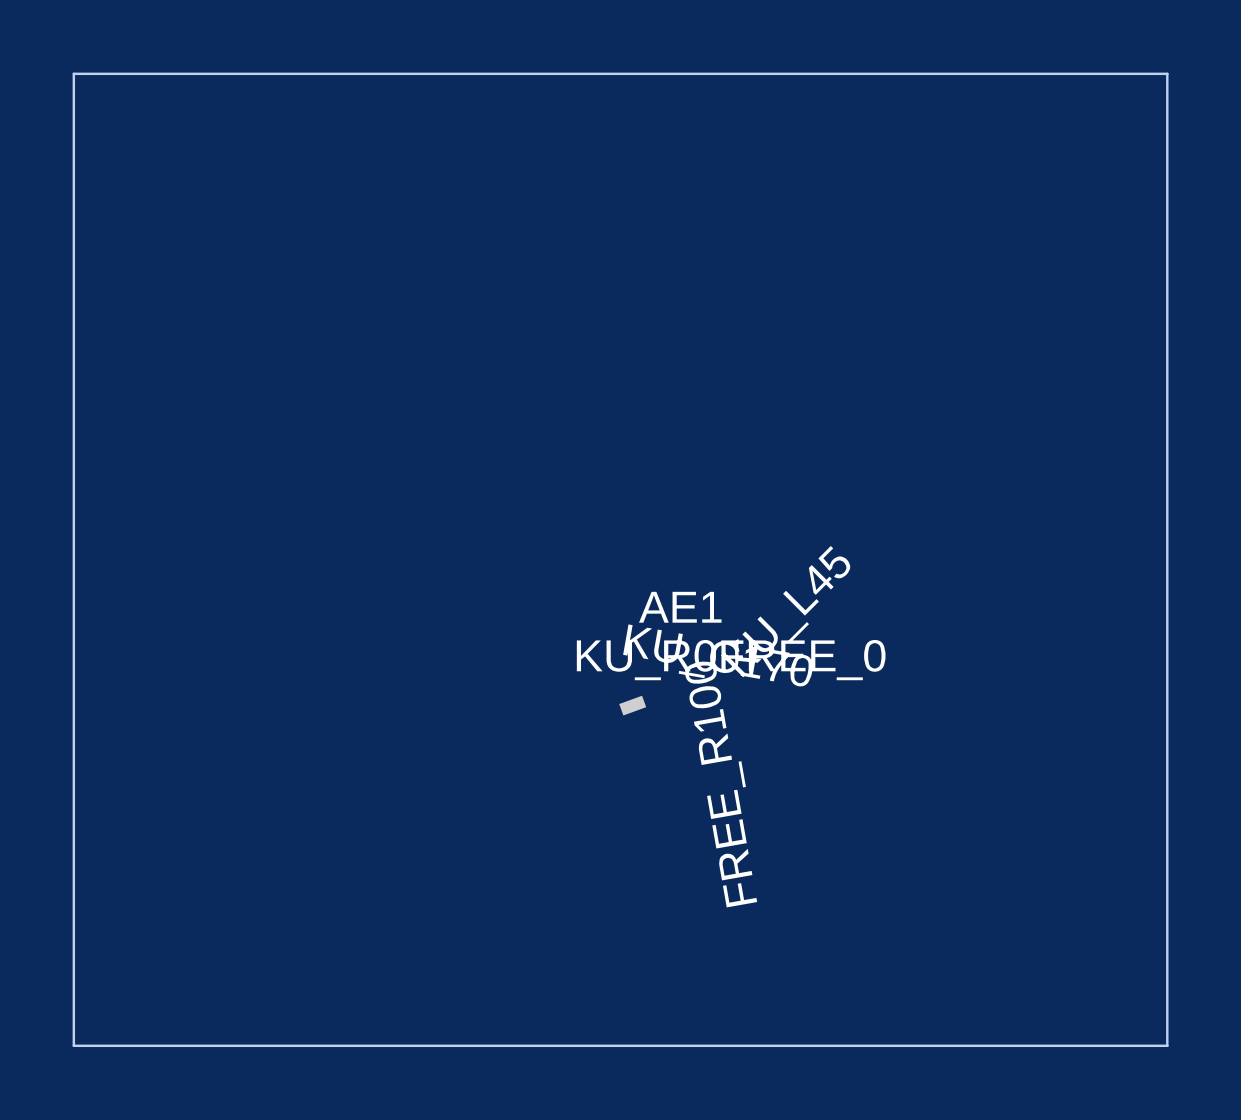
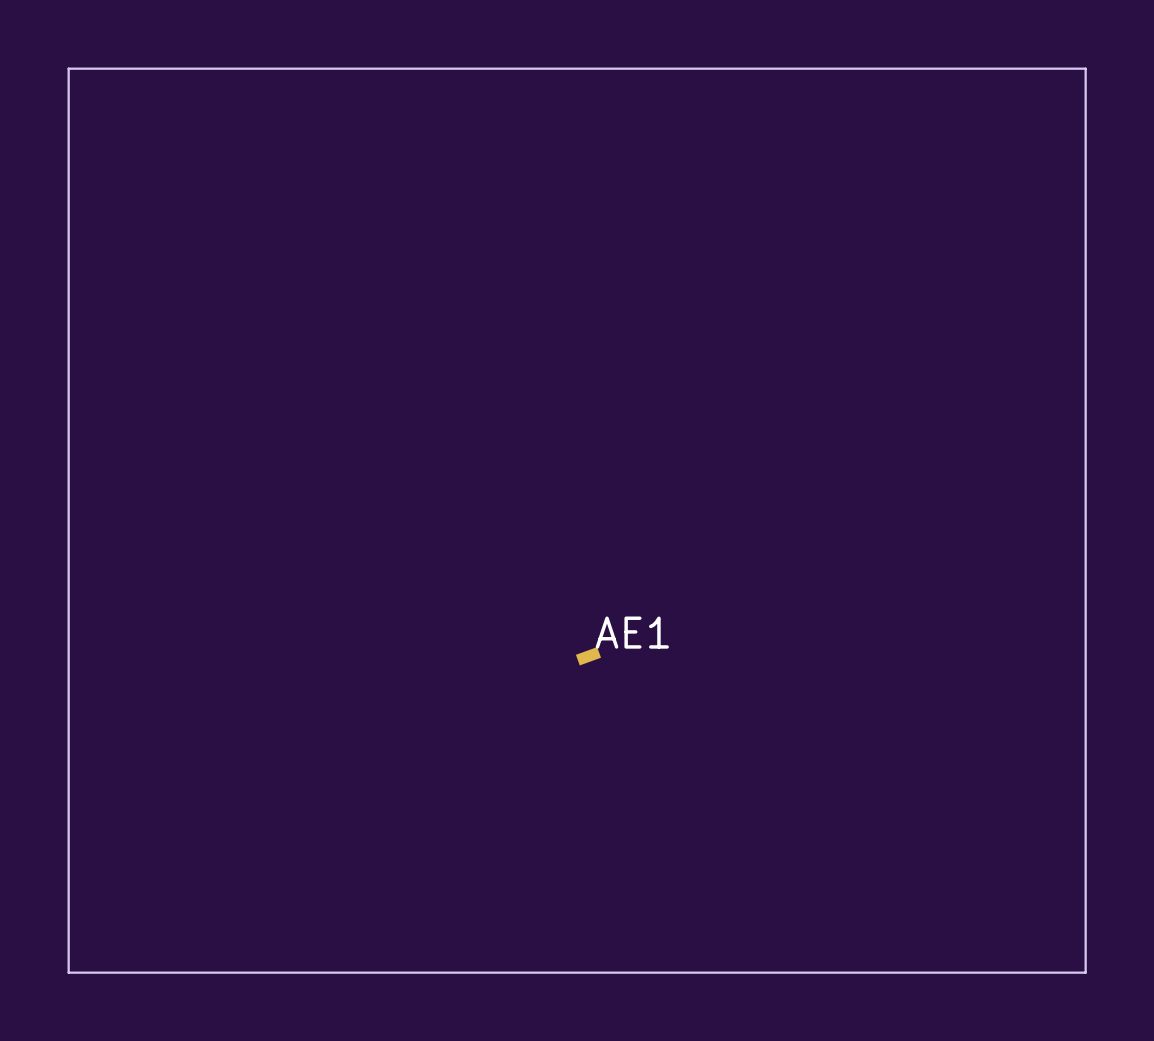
AE1 name position: AE1 (680, 607) -> AE1 (632, 632)
AE1 footprint: [619, 695, 647, 716] -> [575, 647, 602, 666]

